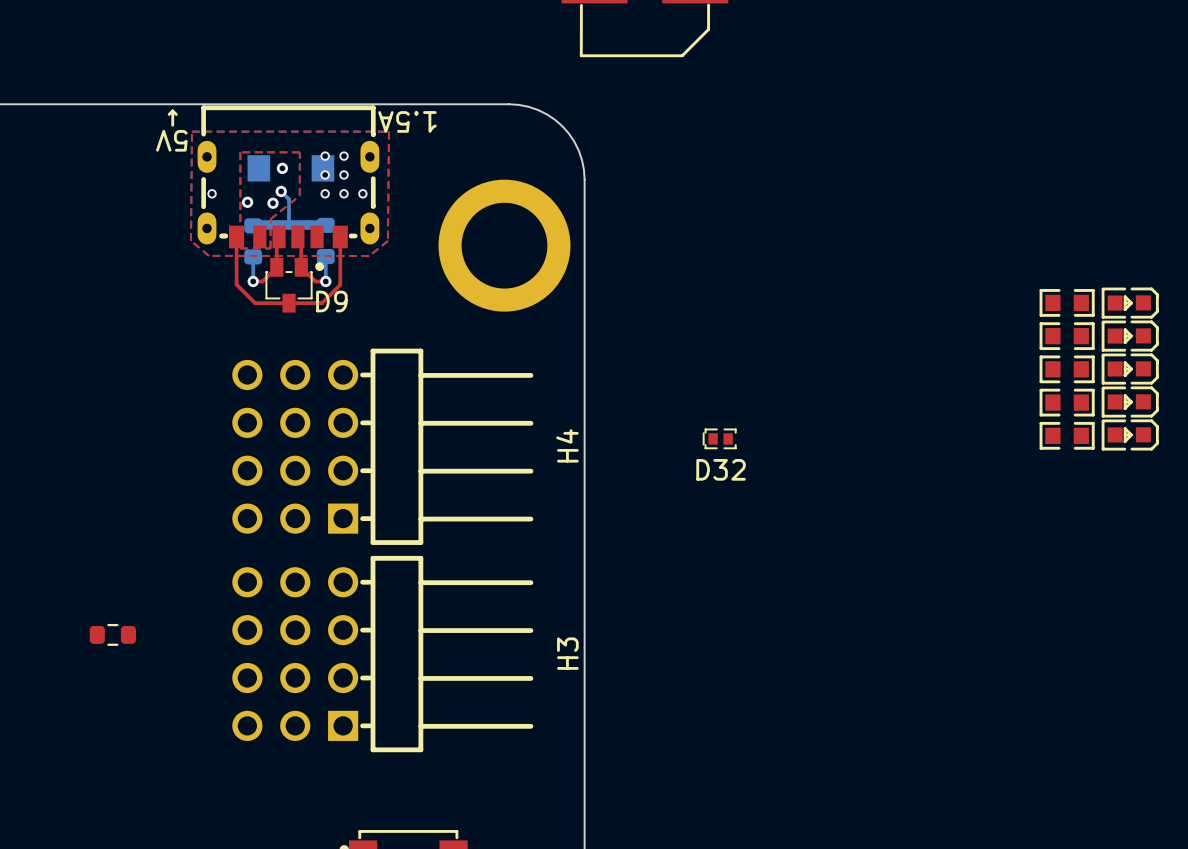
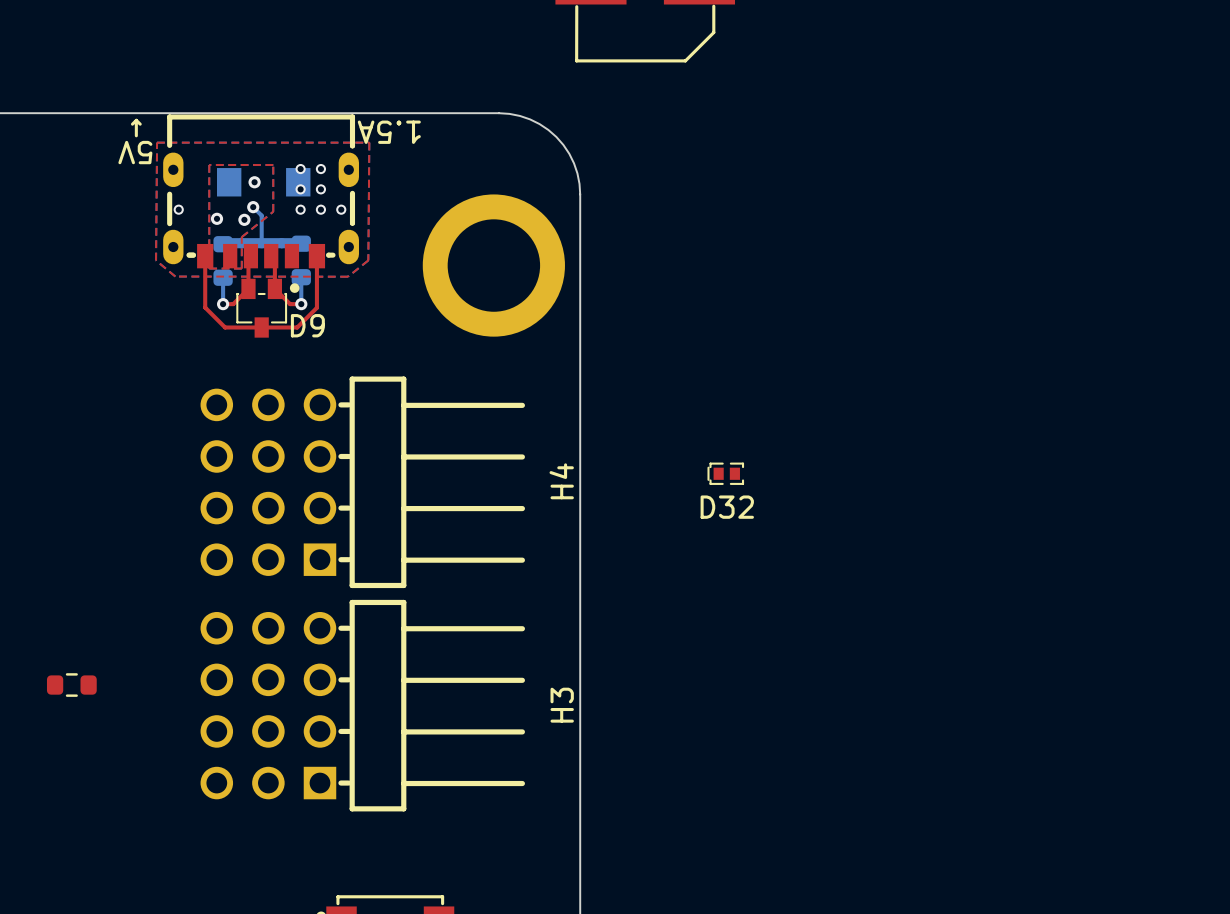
part: (1067, 302) -> none
part: (1130, 303) -> none
part: (1067, 336) -> none
part: (1130, 336) -> none
part: (1067, 369) -> none
part: (1130, 369) -> none
part: (1067, 402) -> none
part: (1130, 402) -> none
part: (1130, 434) -> none
part: (1067, 435) -> none

